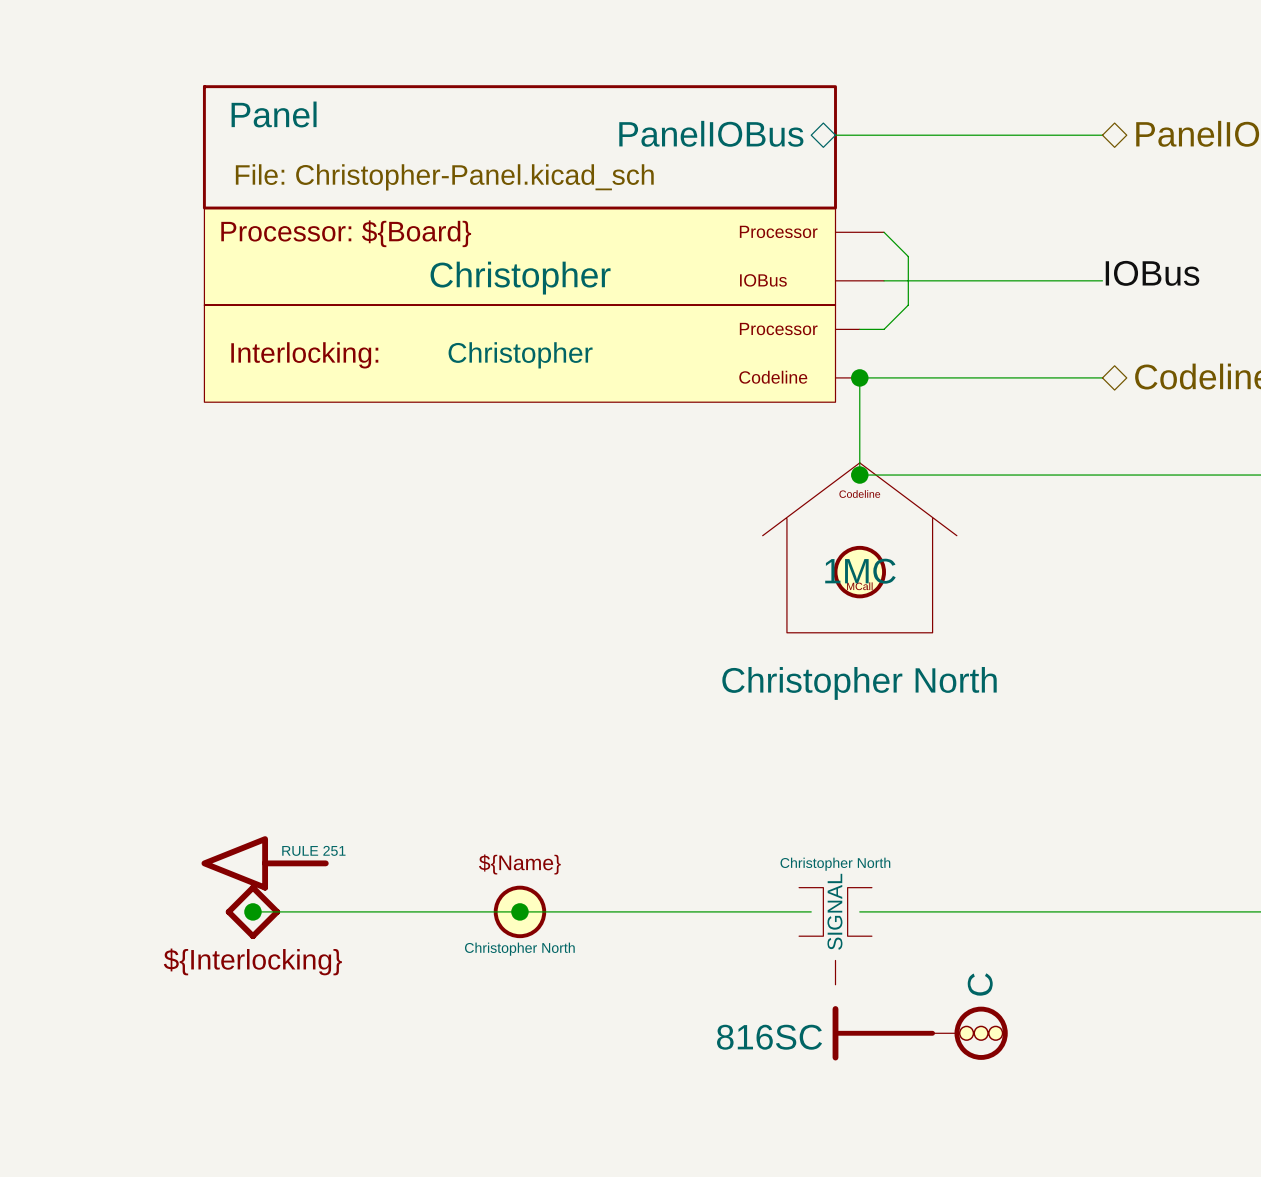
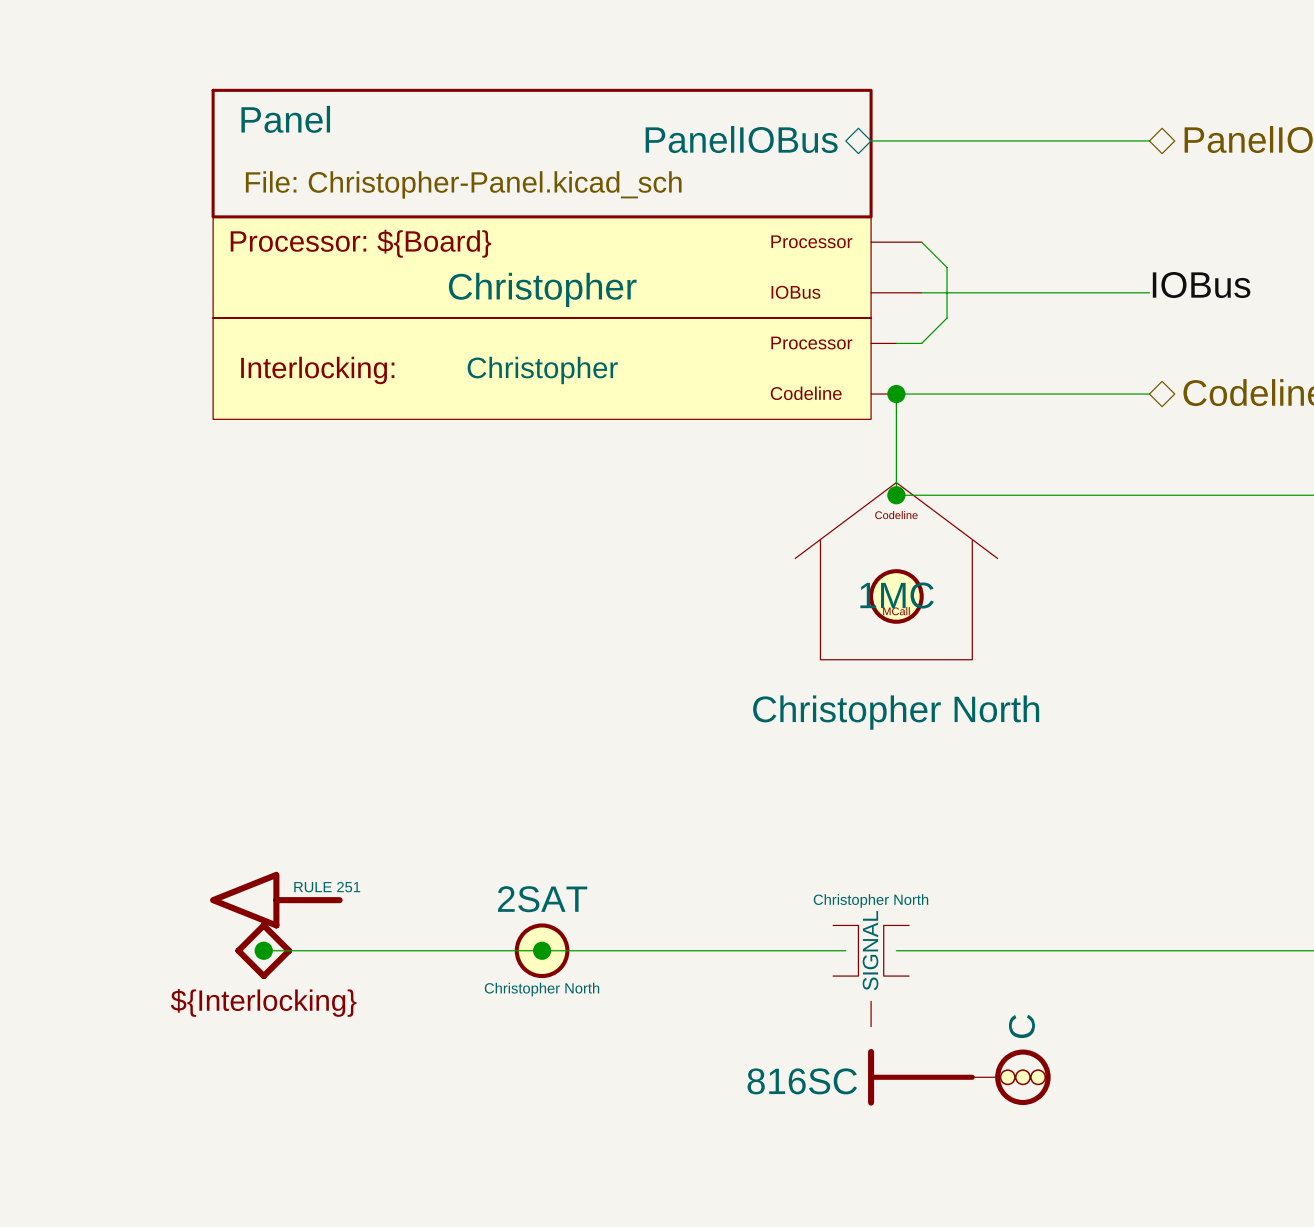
part value: none -> 2SAT (542, 899)
part text: ${Name} (519, 864) -> none

